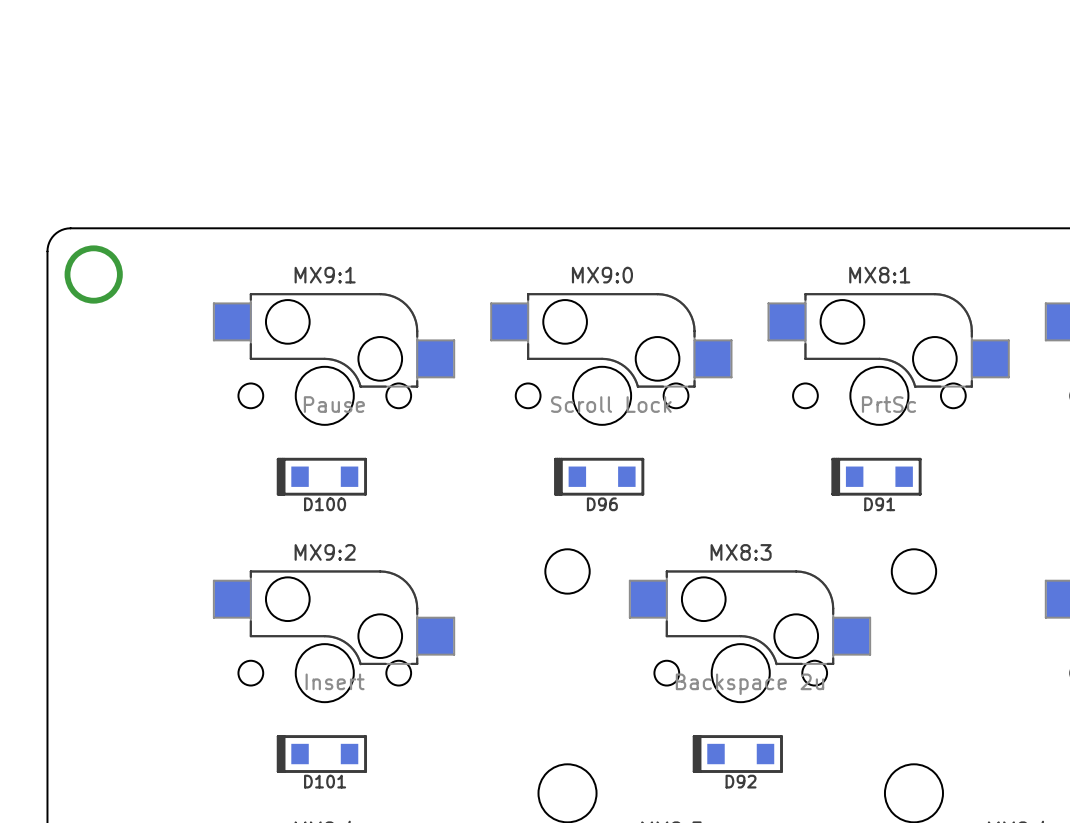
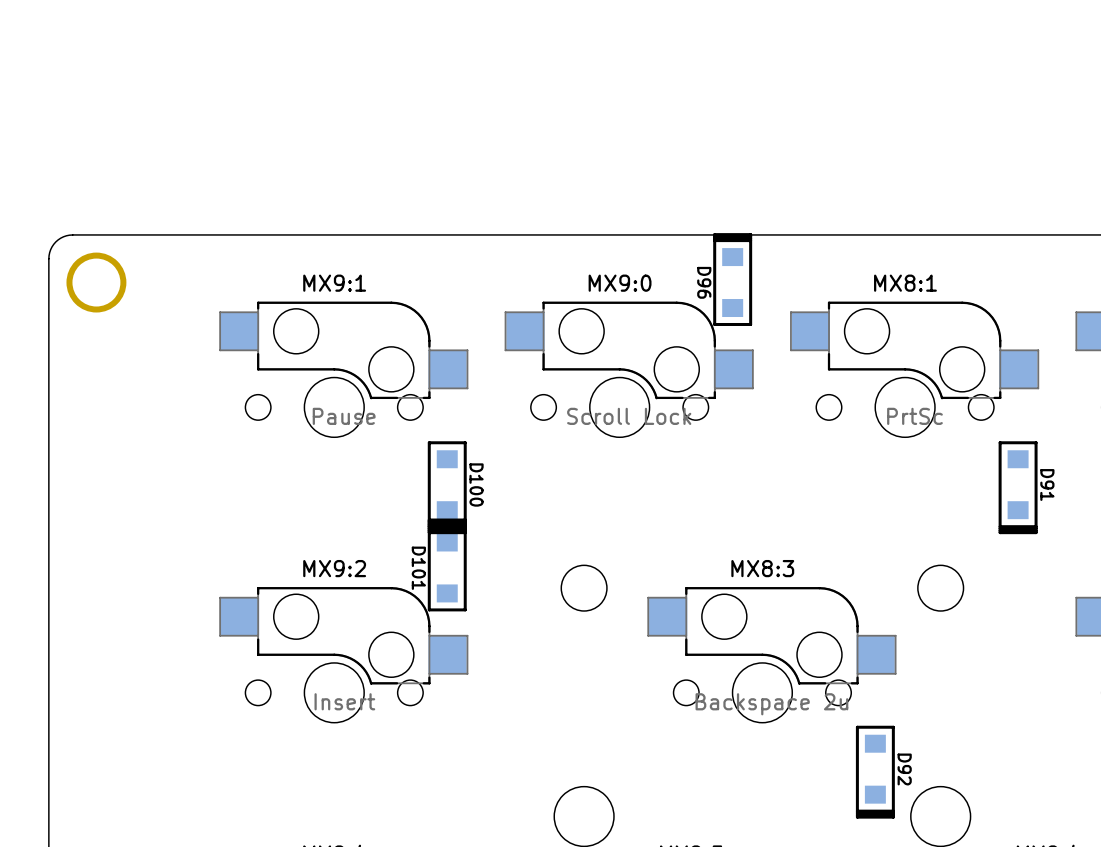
D100 rotation: 0° (321, 476) -> 90° counterclockwise (447, 487)
D100 position: (321, 476) -> (447, 487)
D96 rotation: 0° (599, 476) -> 90° clockwise (732, 279)
D96 position: (599, 476) -> (732, 279)
D91 rotation: 0° (876, 476) -> 90° counterclockwise (1018, 487)
D91 position: (876, 476) -> (1018, 487)
D101 rotation: 0° (321, 754) -> 90° clockwise (447, 564)
D101 position: (321, 754) -> (447, 564)
D92 rotation: 0° (737, 754) -> 90° counterclockwise (875, 772)
D92 position: (737, 754) -> (875, 772)

